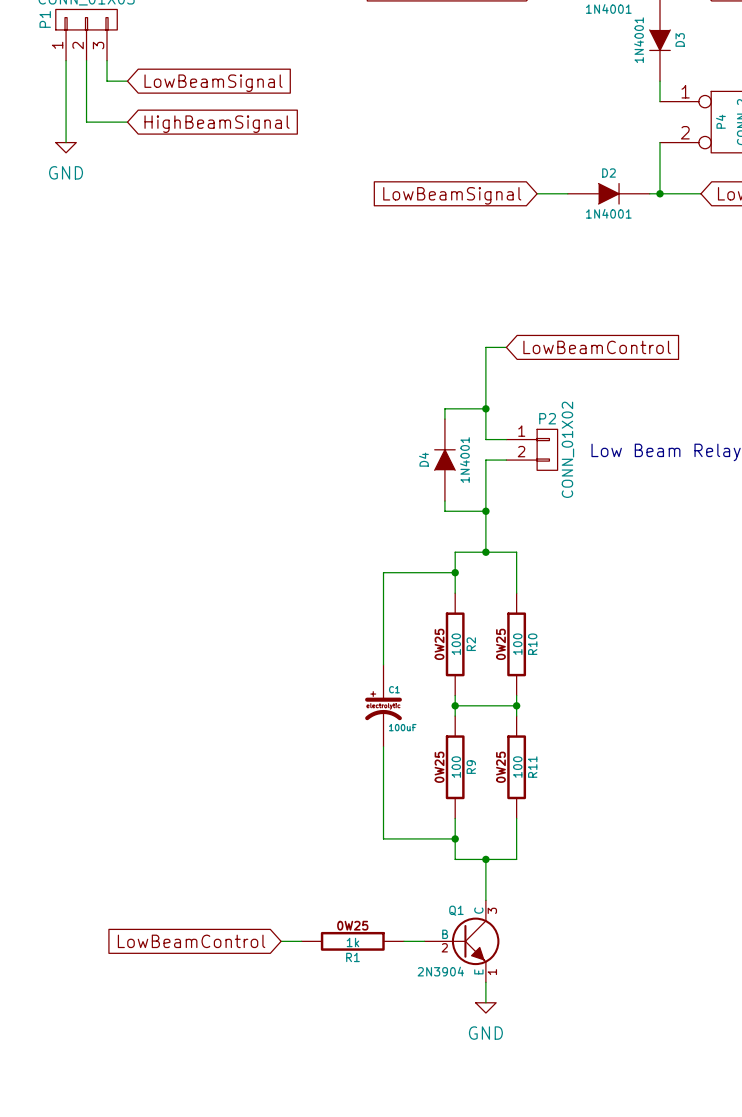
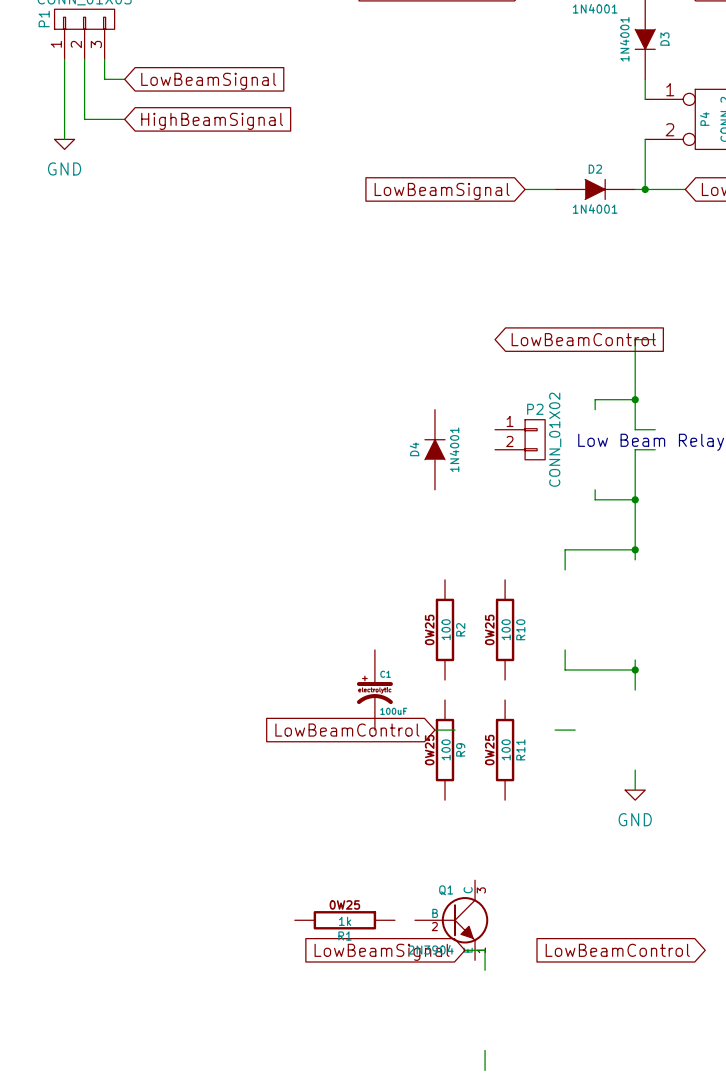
wire: (506, 347) (485, 347) (485, 439) (506, 439) -> (655, 339) (635, 339) (635, 429) (655, 429)
wire: (485, 408) (444, 408) (444, 419) -> (635, 399) (595, 399) (595, 409)
junction: (485, 408) -> none
junction: none -> (635, 399)
wire: (506, 460) (485, 460) (485, 552) -> none
wire: none -> (655, 449) (635, 449) (635, 559)
wire: (444, 501) (444, 511) (485, 511) -> (595, 489) (595, 499) (635, 499)
junction: (485, 511) -> none
junction: none -> (635, 499)
junction: (485, 552) -> none
wire: none -> (635, 549) (565, 549) (565, 569)
junction: none -> (635, 549)
wire: (455, 572) (383, 572) (383, 664) -> none
junction: (455, 572) -> none
wire: (455, 593) (455, 552) (516, 552) (516, 593) -> none
wire: none -> (565, 649) (565, 669) (635, 669)
wire: none -> (635, 659) (635, 690)
junction: none -> (635, 669)
wire: (455, 695) (455, 716) -> none
wire: (516, 695) (516, 716) -> (635, 770) (635, 790)
wire: (455, 705) (516, 705) -> none
junction: (455, 705) -> none
junction: (516, 705) -> none
global label: none -> LowBeamControl (347, 730)
wire: (383, 746) (383, 838) (455, 838) -> none
wire: none -> (555, 730) (575, 730)
power symbol: none -> GND (635, 795)
wire: (455, 818) (455, 859) (516, 859) (516, 818) -> none
junction: (455, 838) -> none
wire: (485, 859) (485, 900) -> none
junction: (485, 859) -> none
global label: LowBeamControl (191, 941) -> none
wire: (281, 941) (301, 941) -> none
wire: (403, 941) (424, 941) -> (434, 730) (455, 730)
wire: none -> (465, 950) (485, 950) (485, 970)
global label: none -> LowBeamControl (617, 950)
global label: none -> LowBeamSignal (382, 952)
wire: (485, 982) (485, 1002) -> (485, 1050) (485, 1070)
power symbol: GND (485, 1007) -> none

